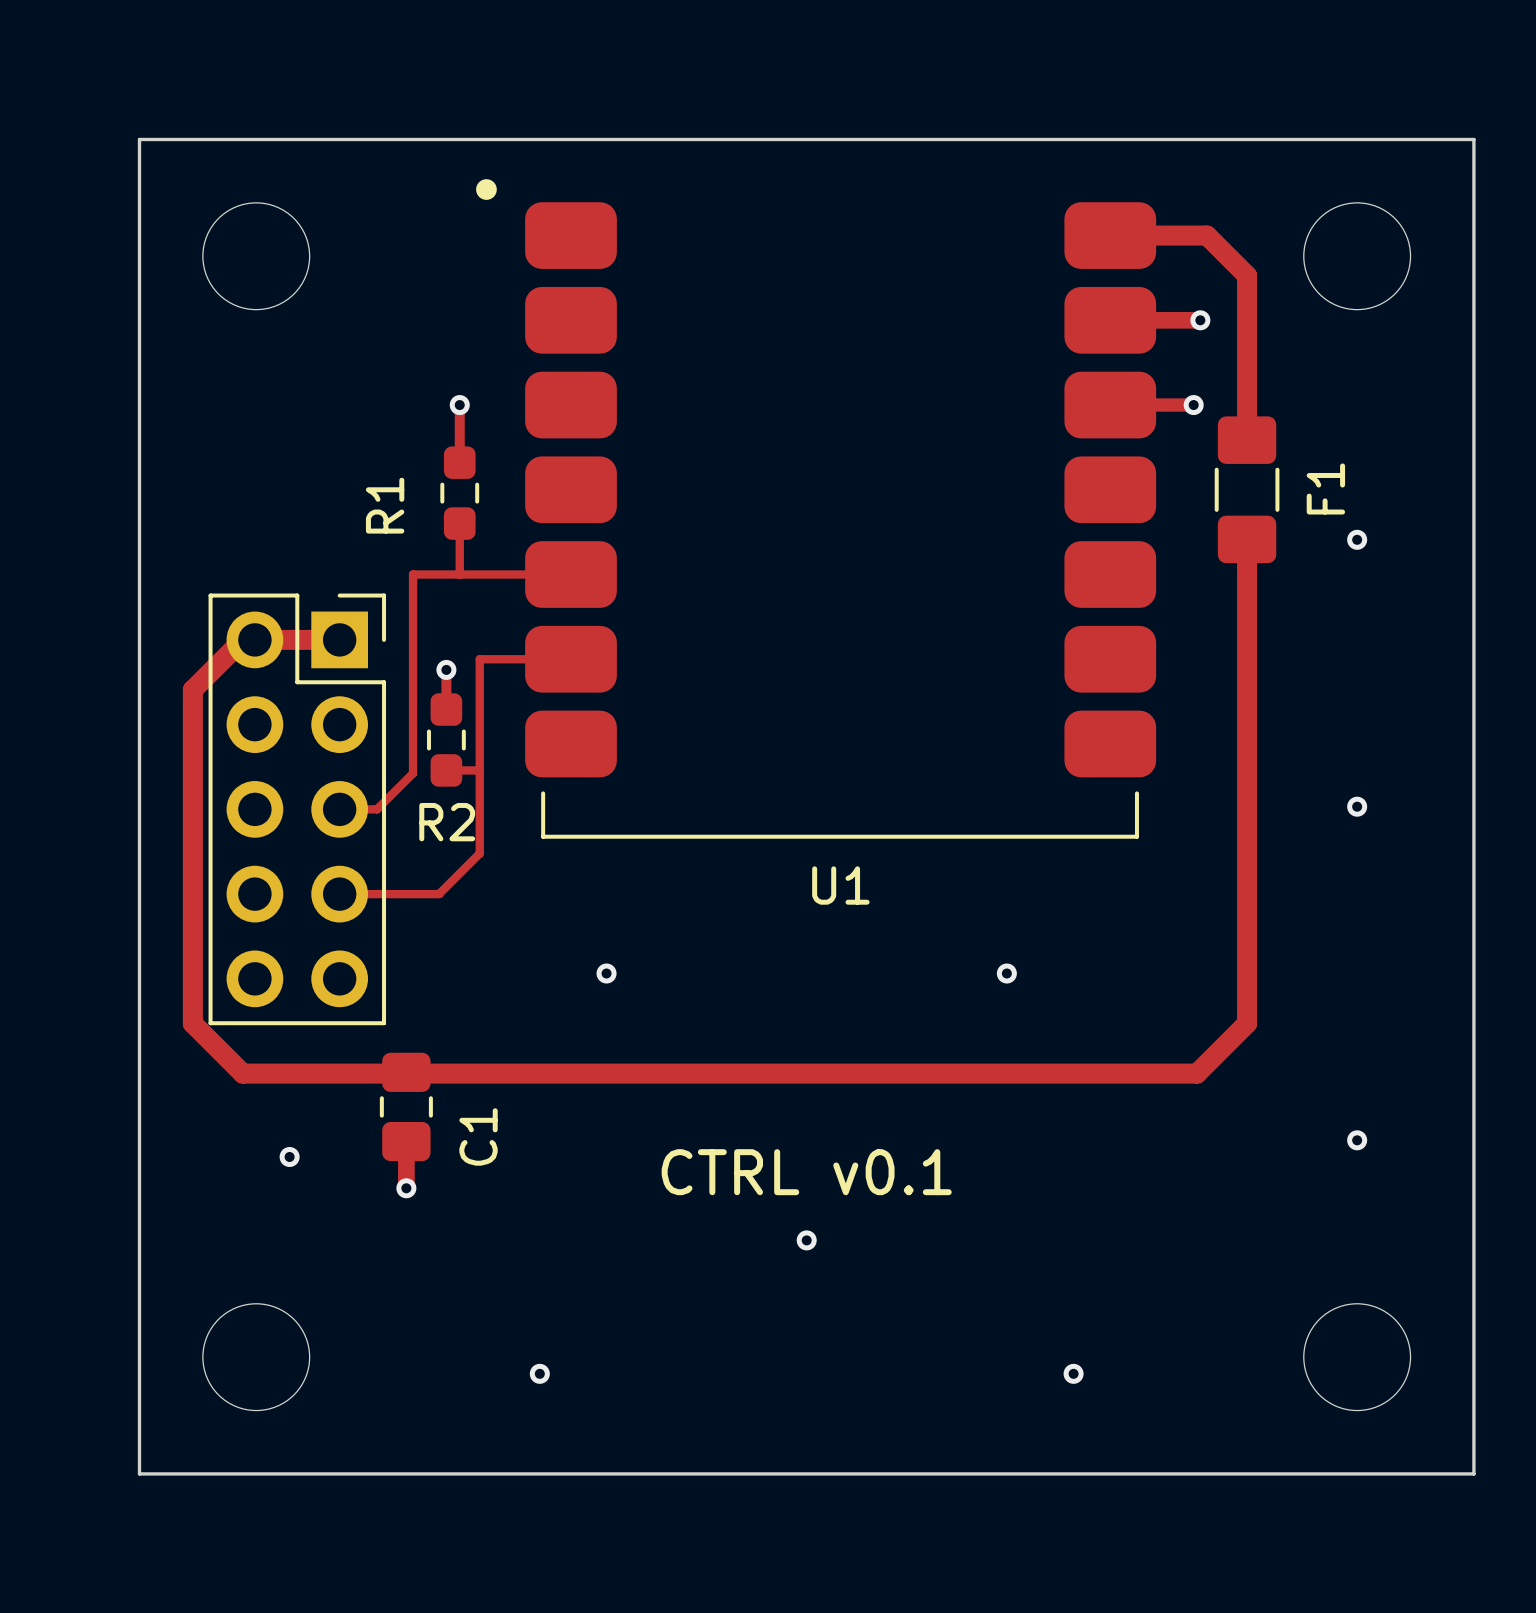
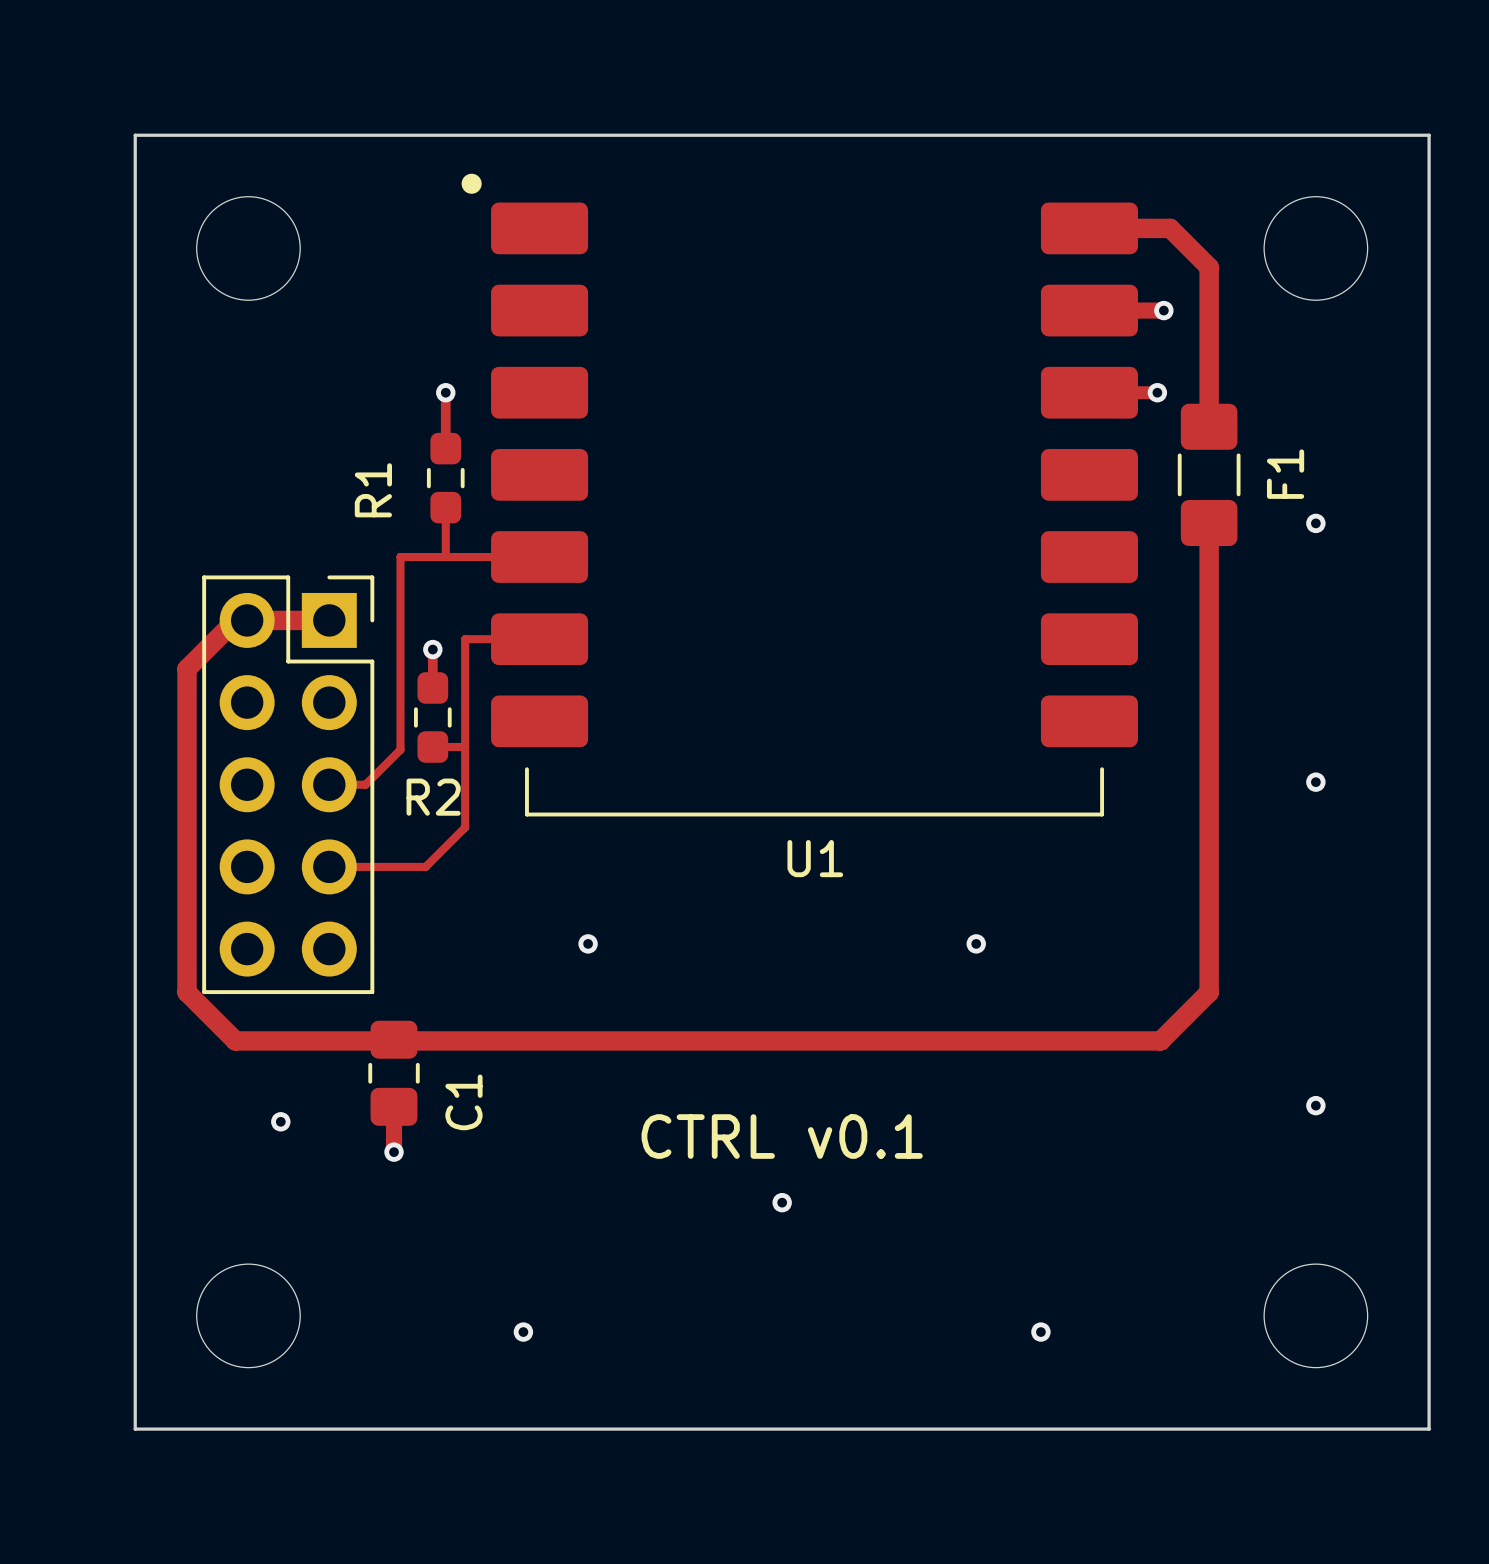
U1 footprint: [476, 179, 1157, 839] -> [461, 173, 1138, 817]

